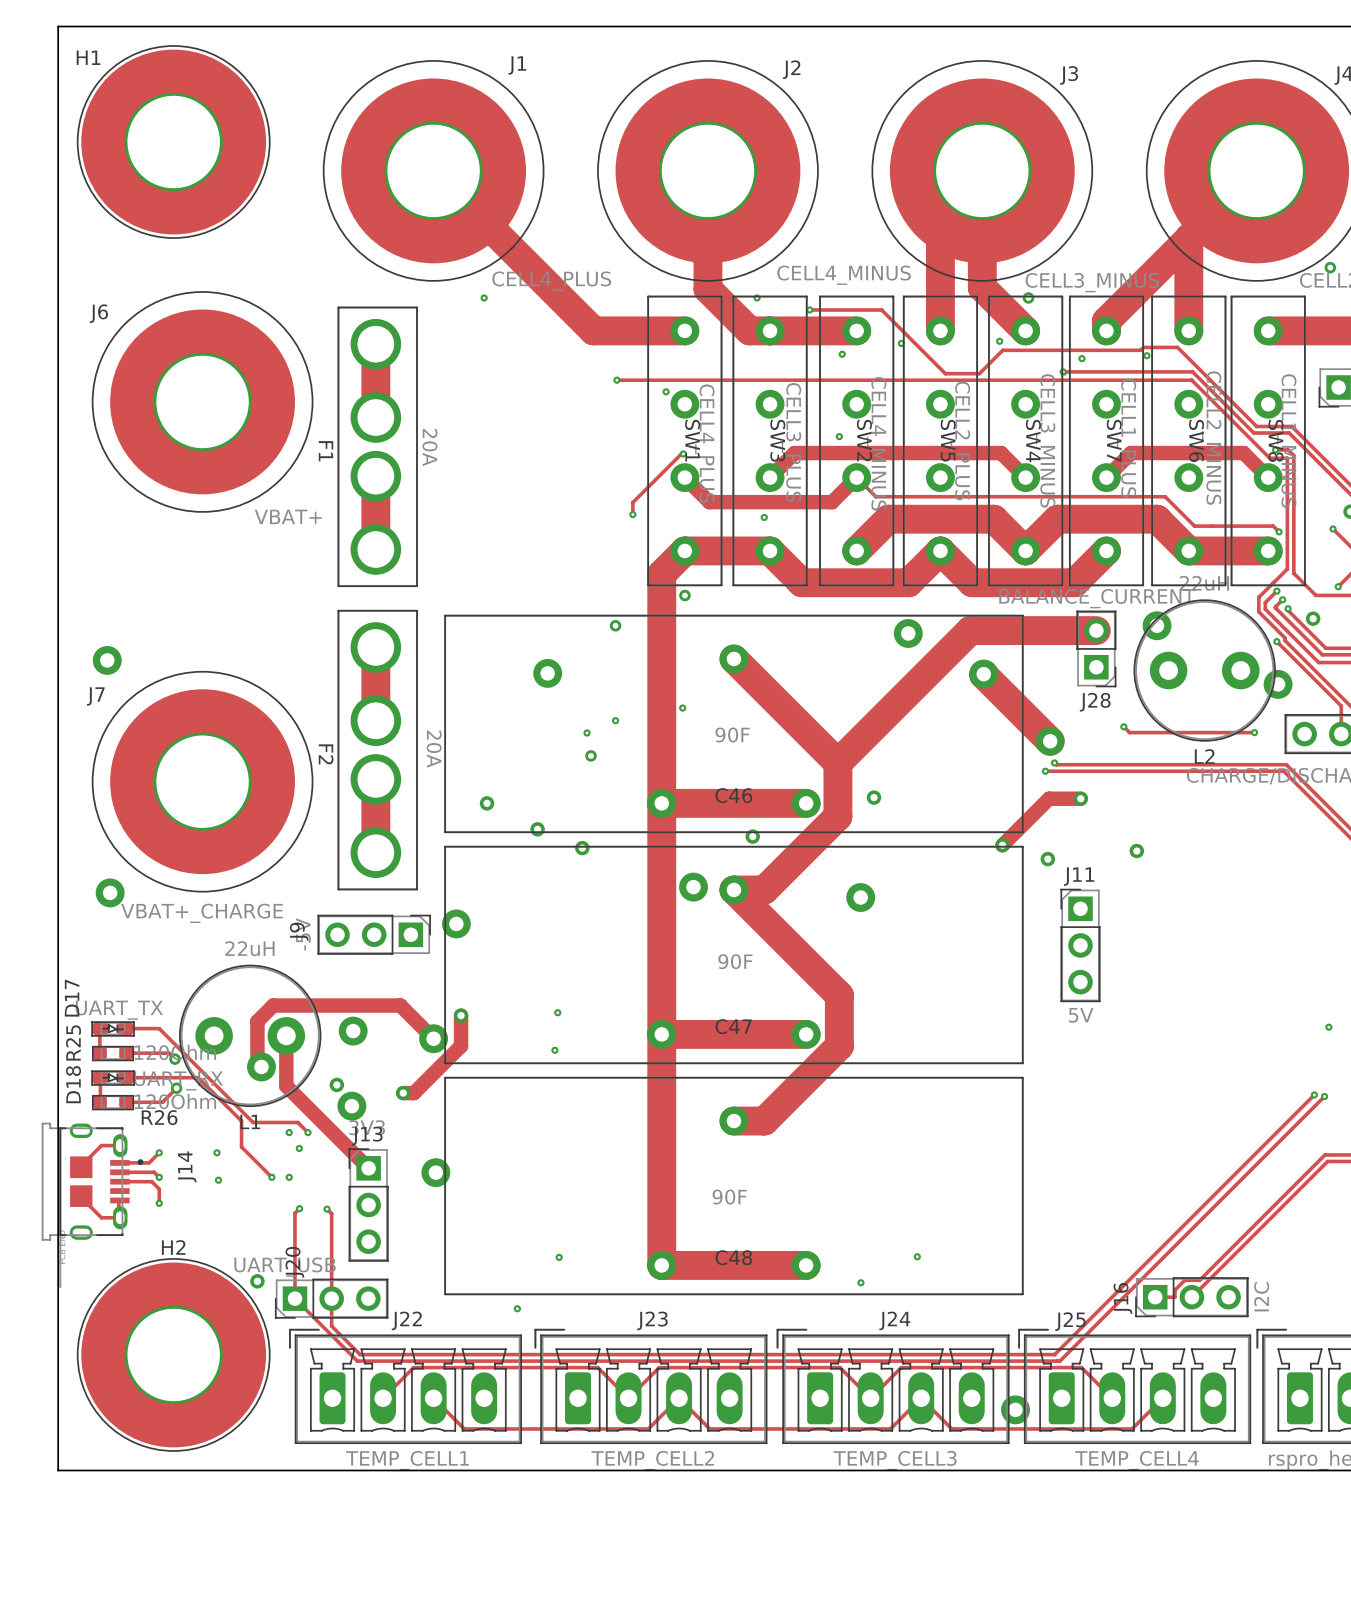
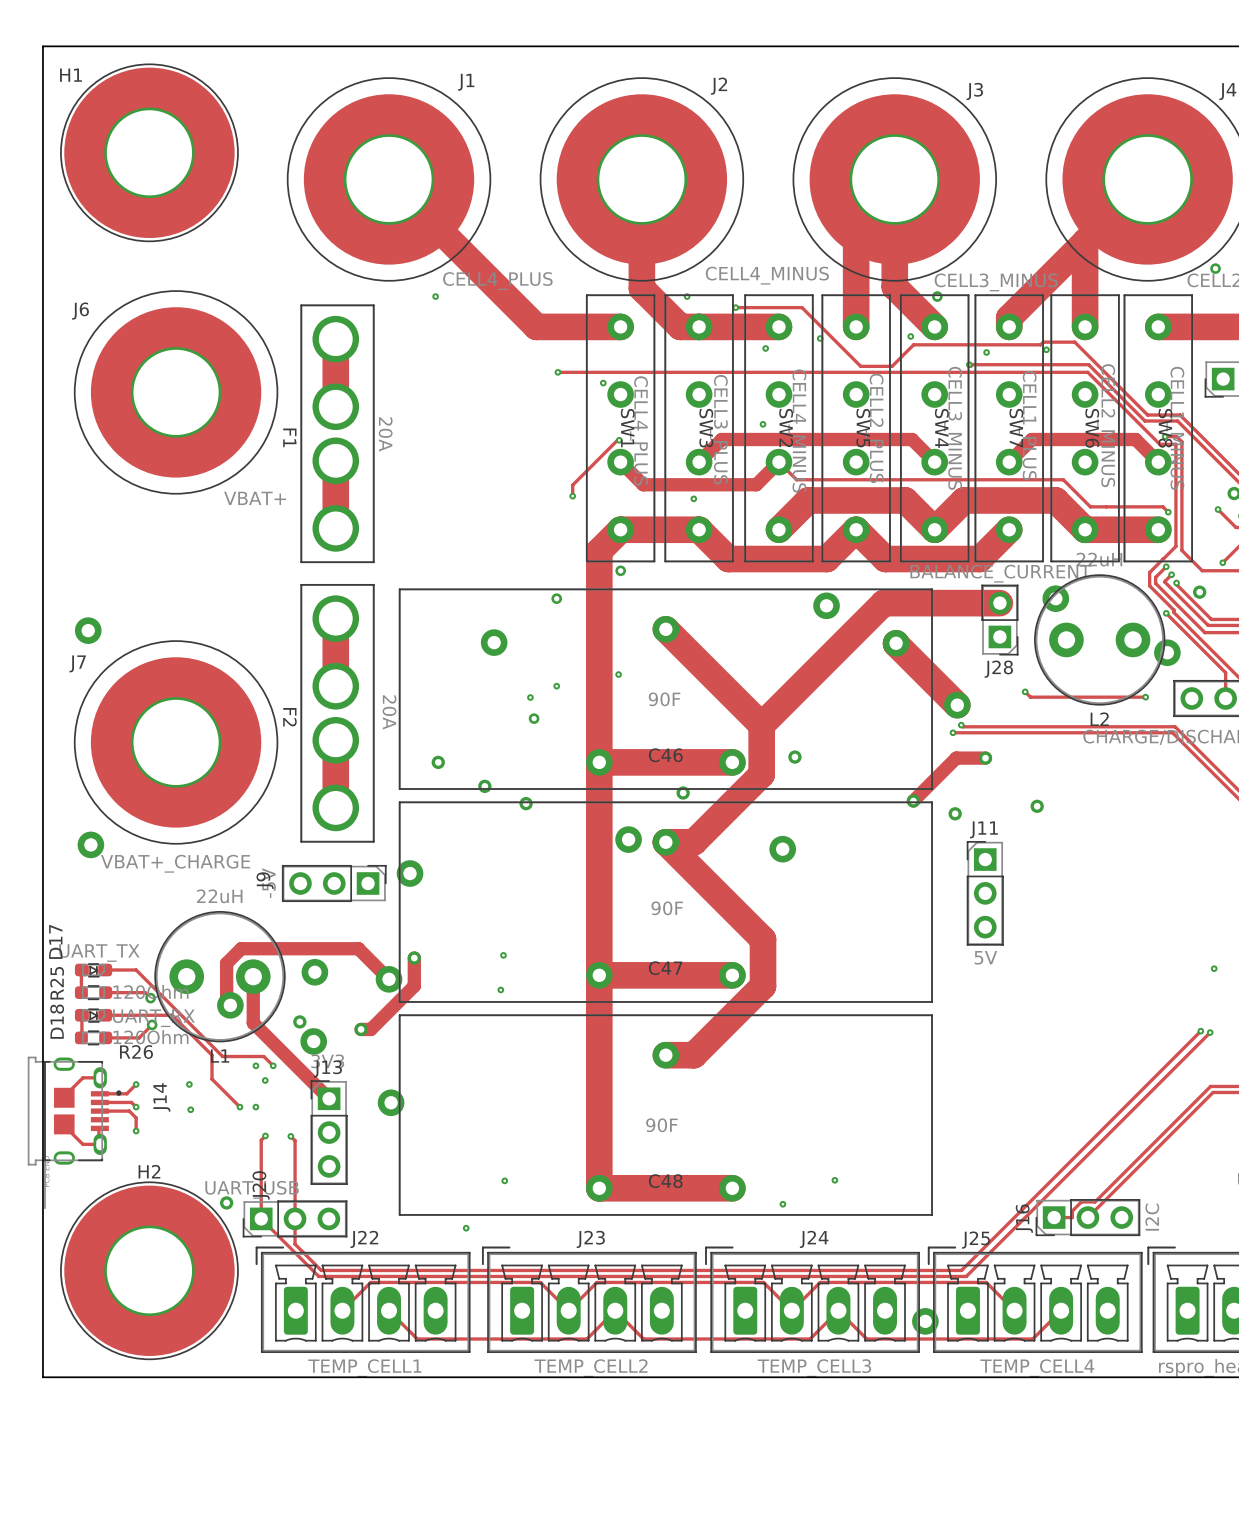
D17 footprint: [91, 1021, 135, 1037] -> [74, 963, 113, 978]
R25 footprint: [91, 1045, 135, 1062] -> [74, 985, 113, 1000]
D18 footprint: [91, 1070, 135, 1086] -> [74, 1008, 113, 1023]
R26 footprint: [91, 1094, 135, 1111] -> [74, 1030, 113, 1046]

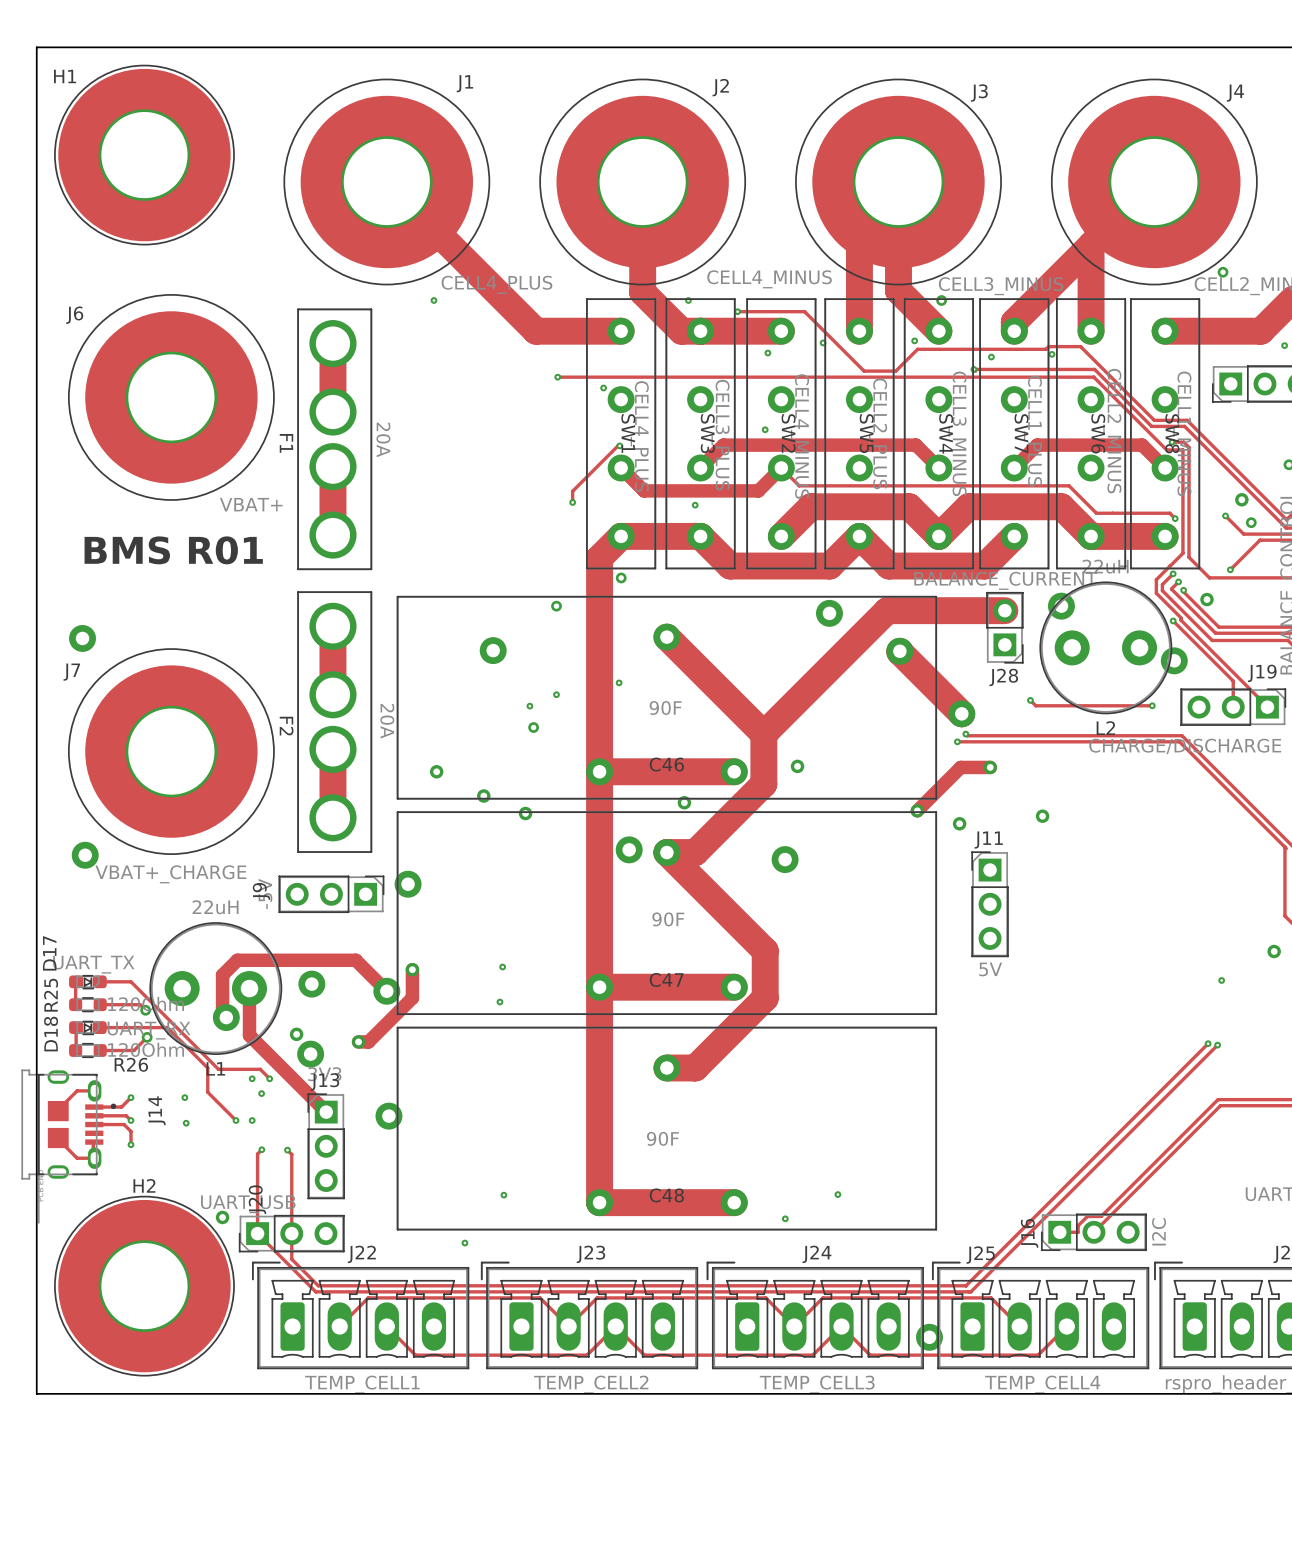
text: none -> BMS R01 (173, 550)

